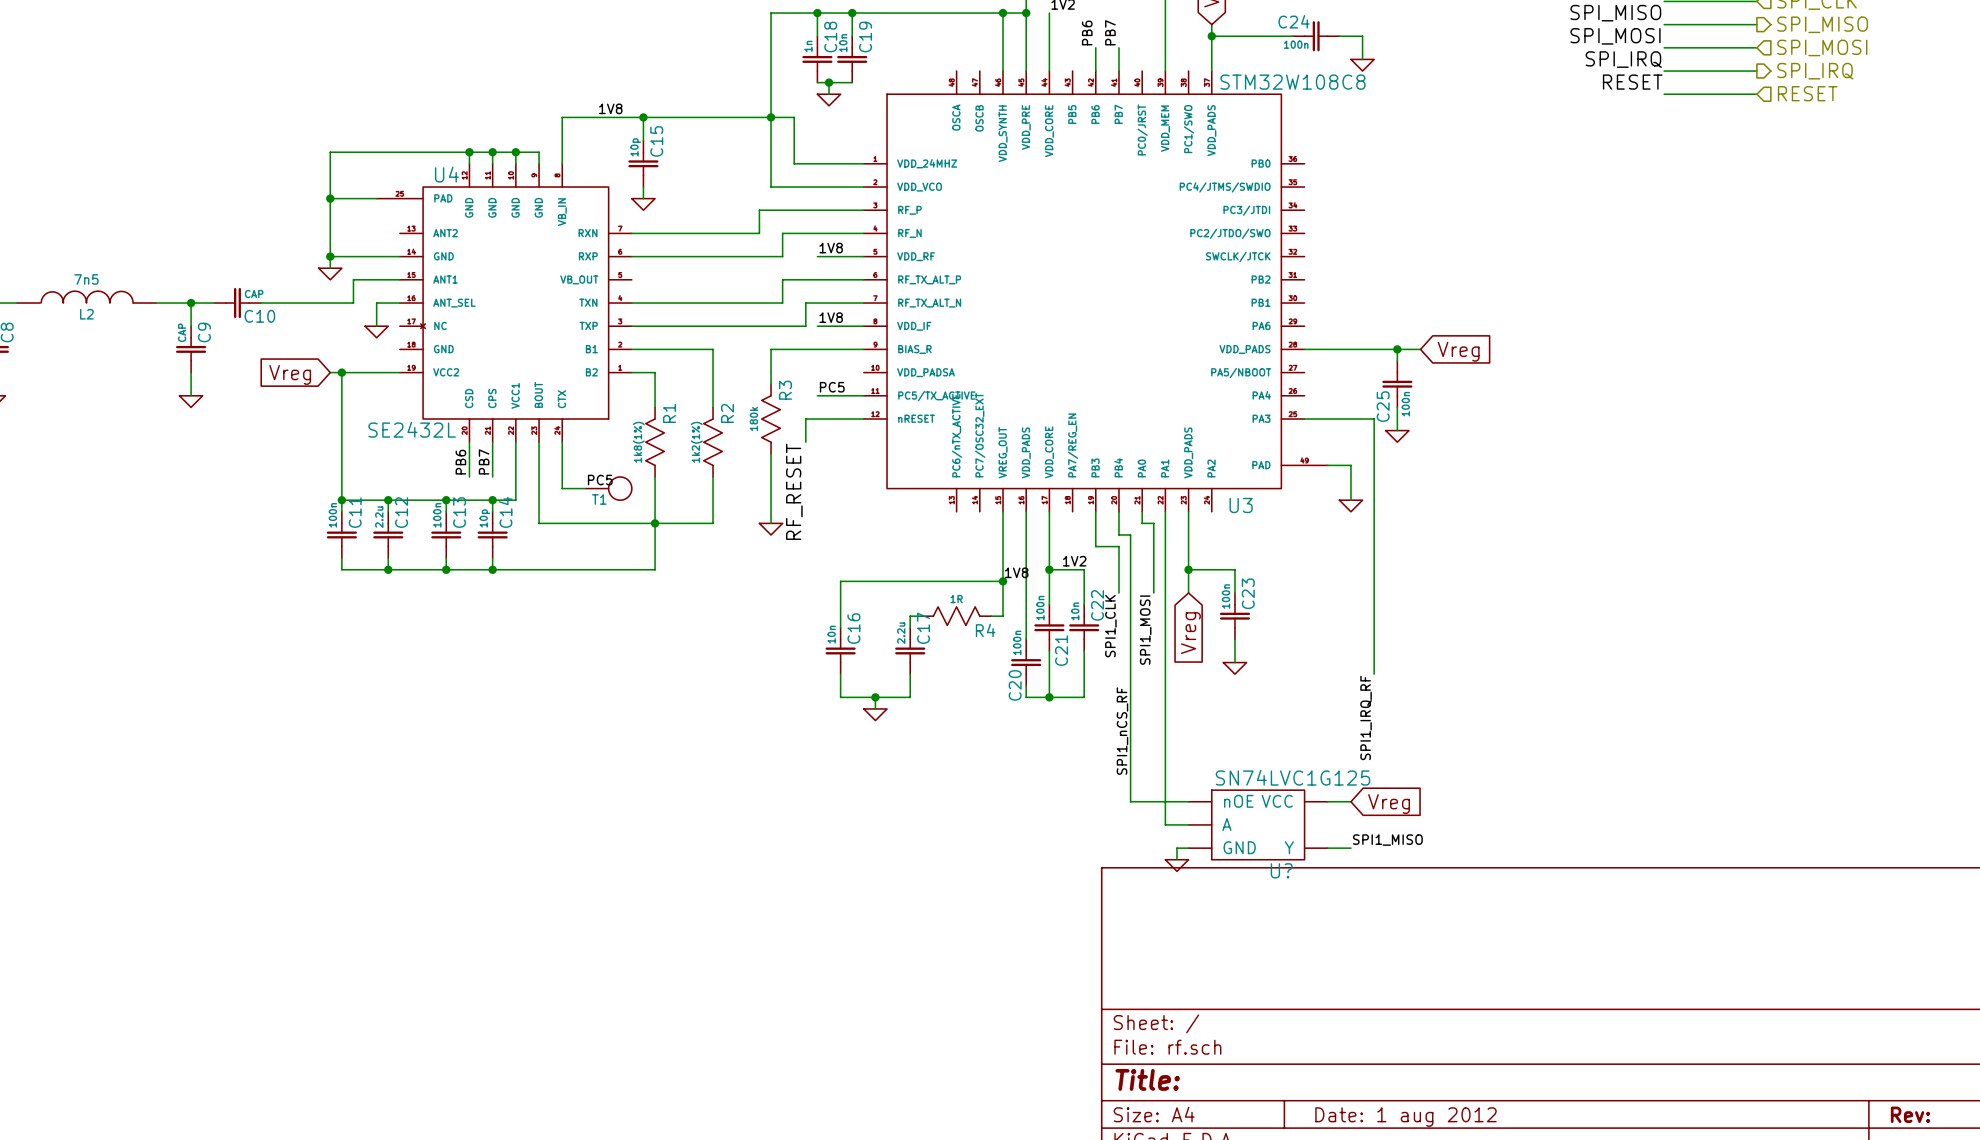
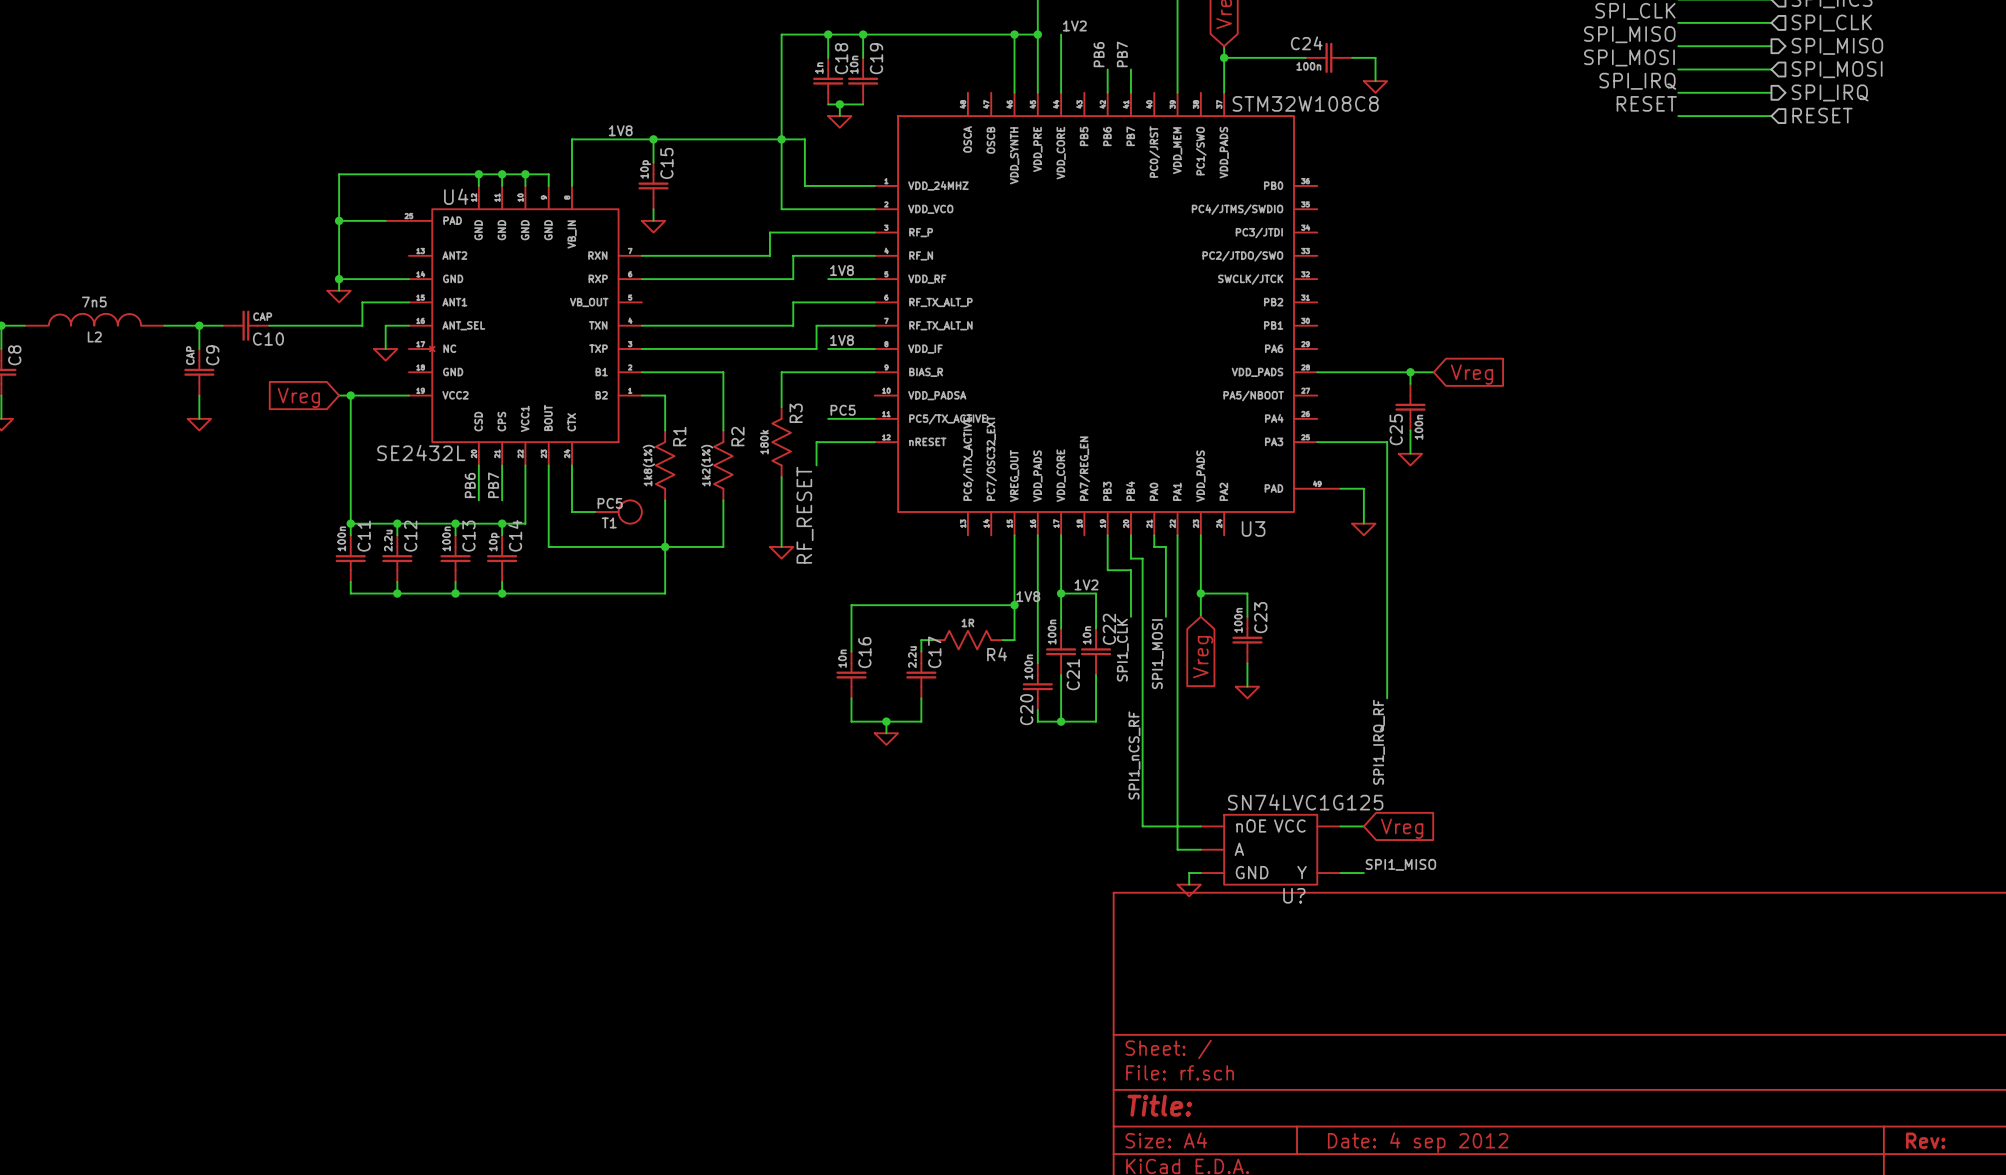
title block: Date: 1 aug 2012 (1405, 1117) -> Date: 4 sep 2012 (1418, 1142)

